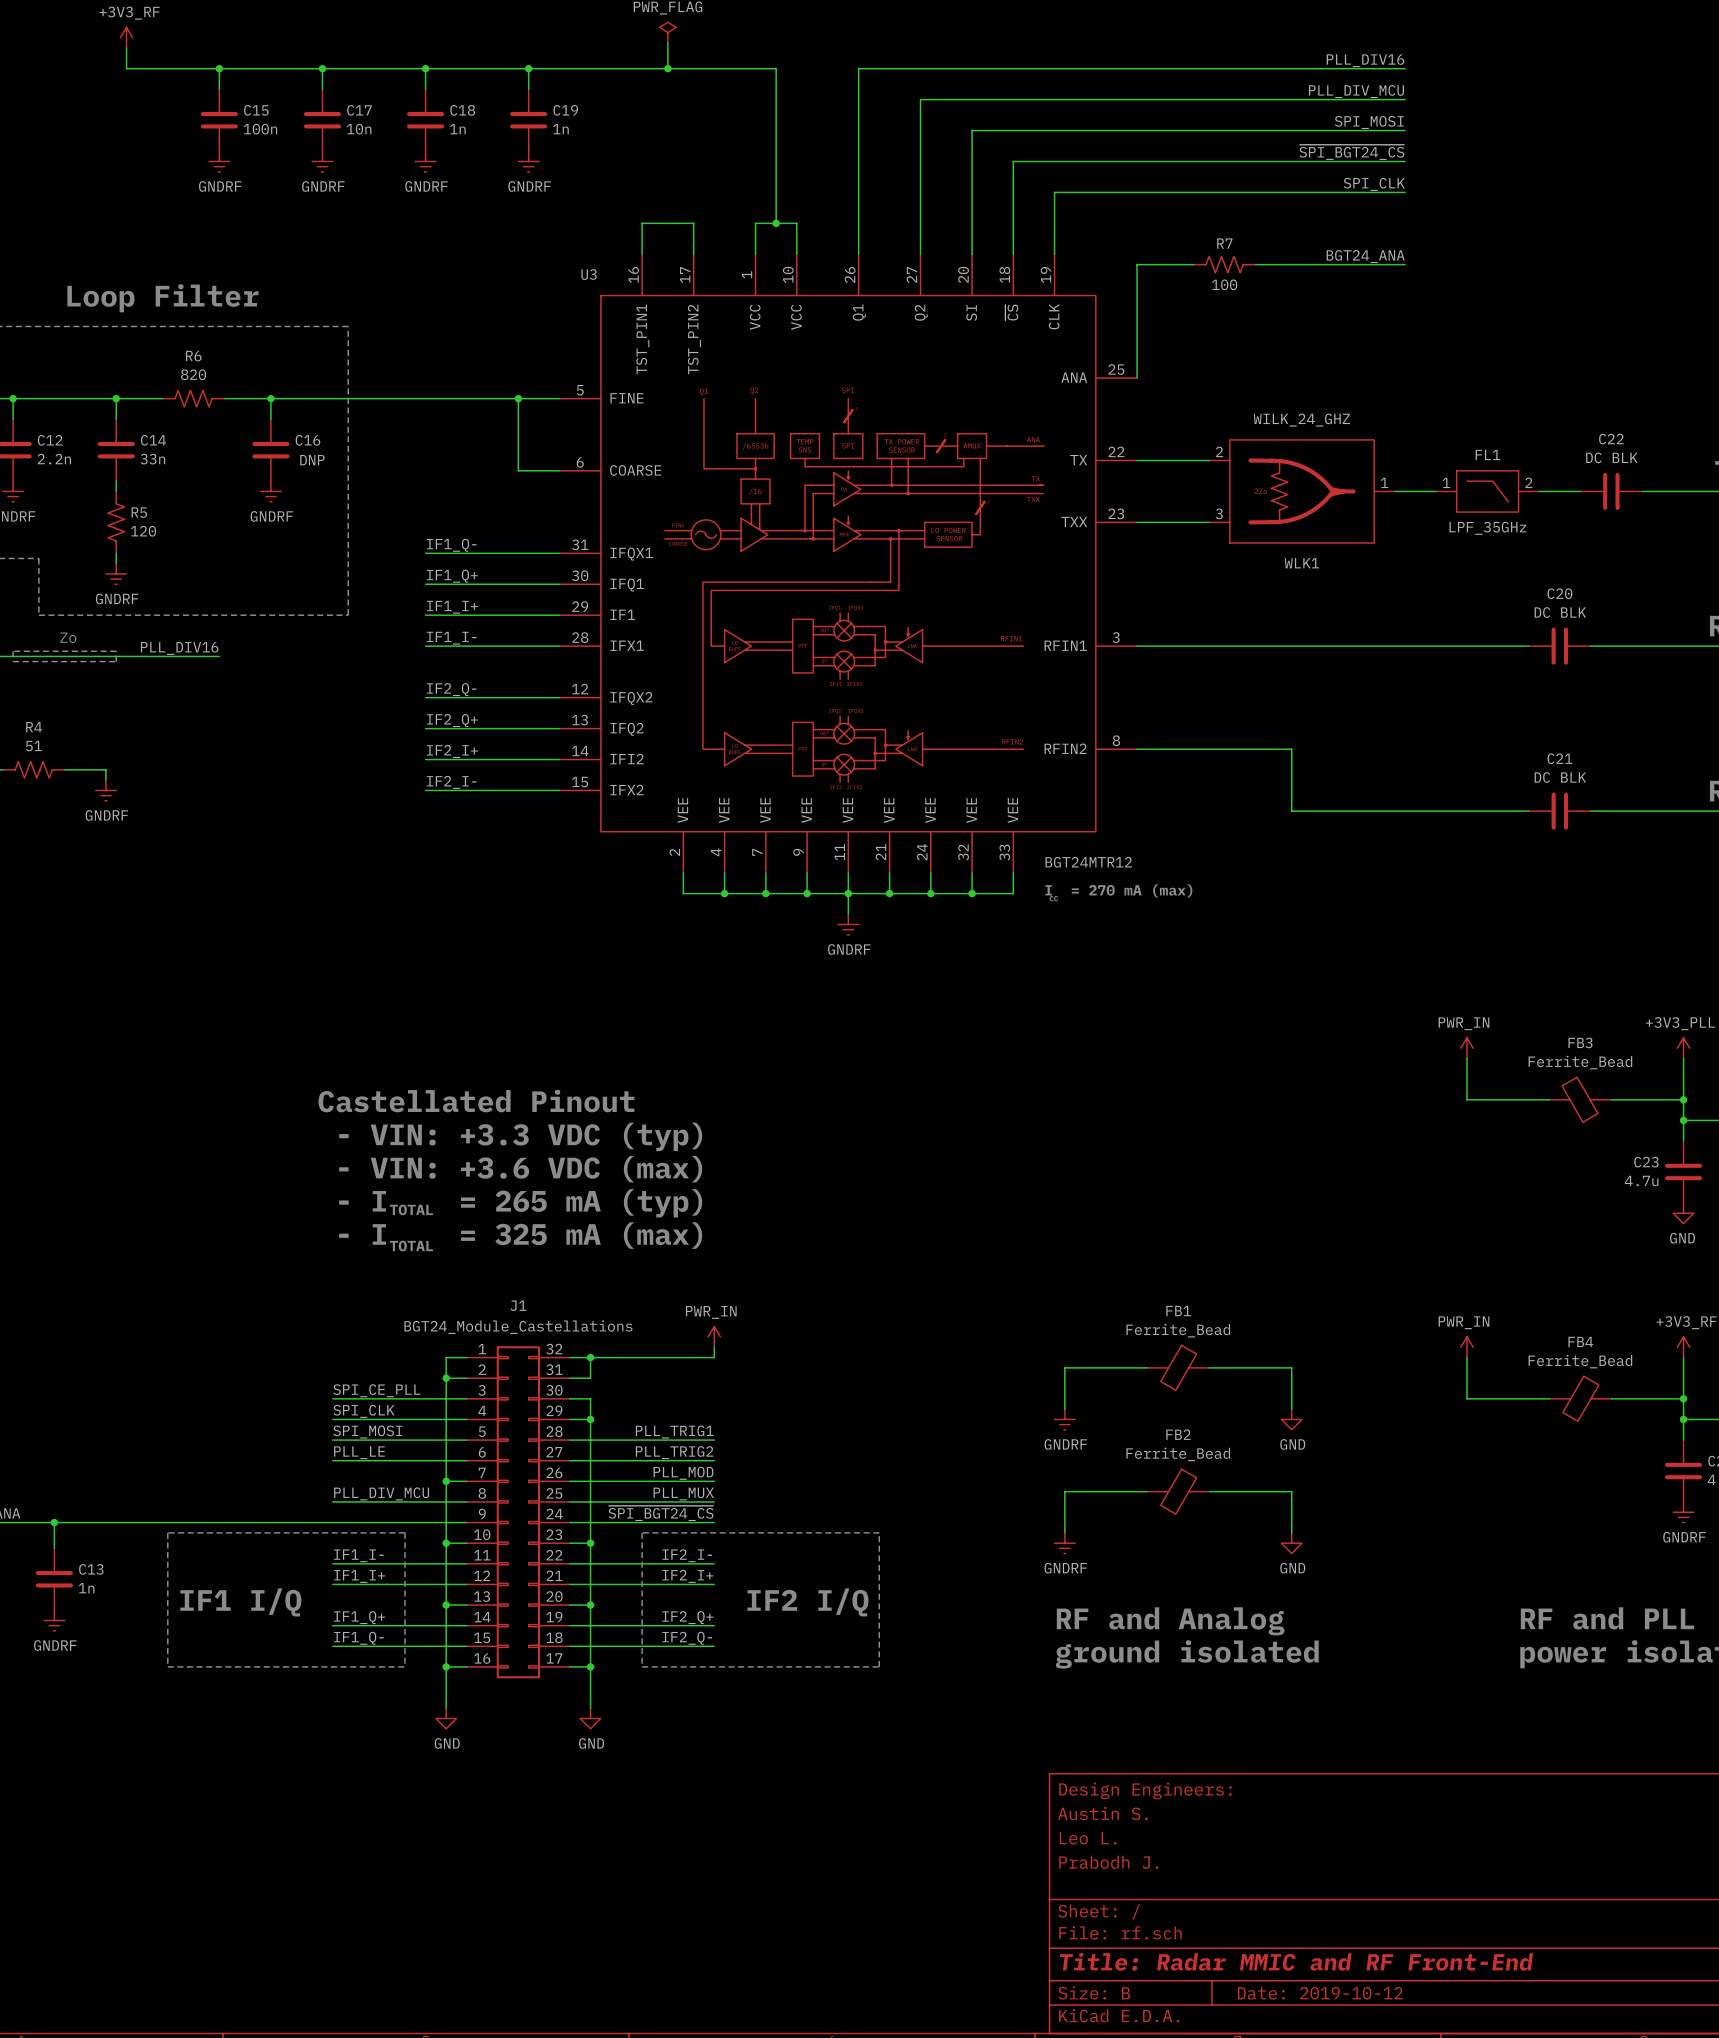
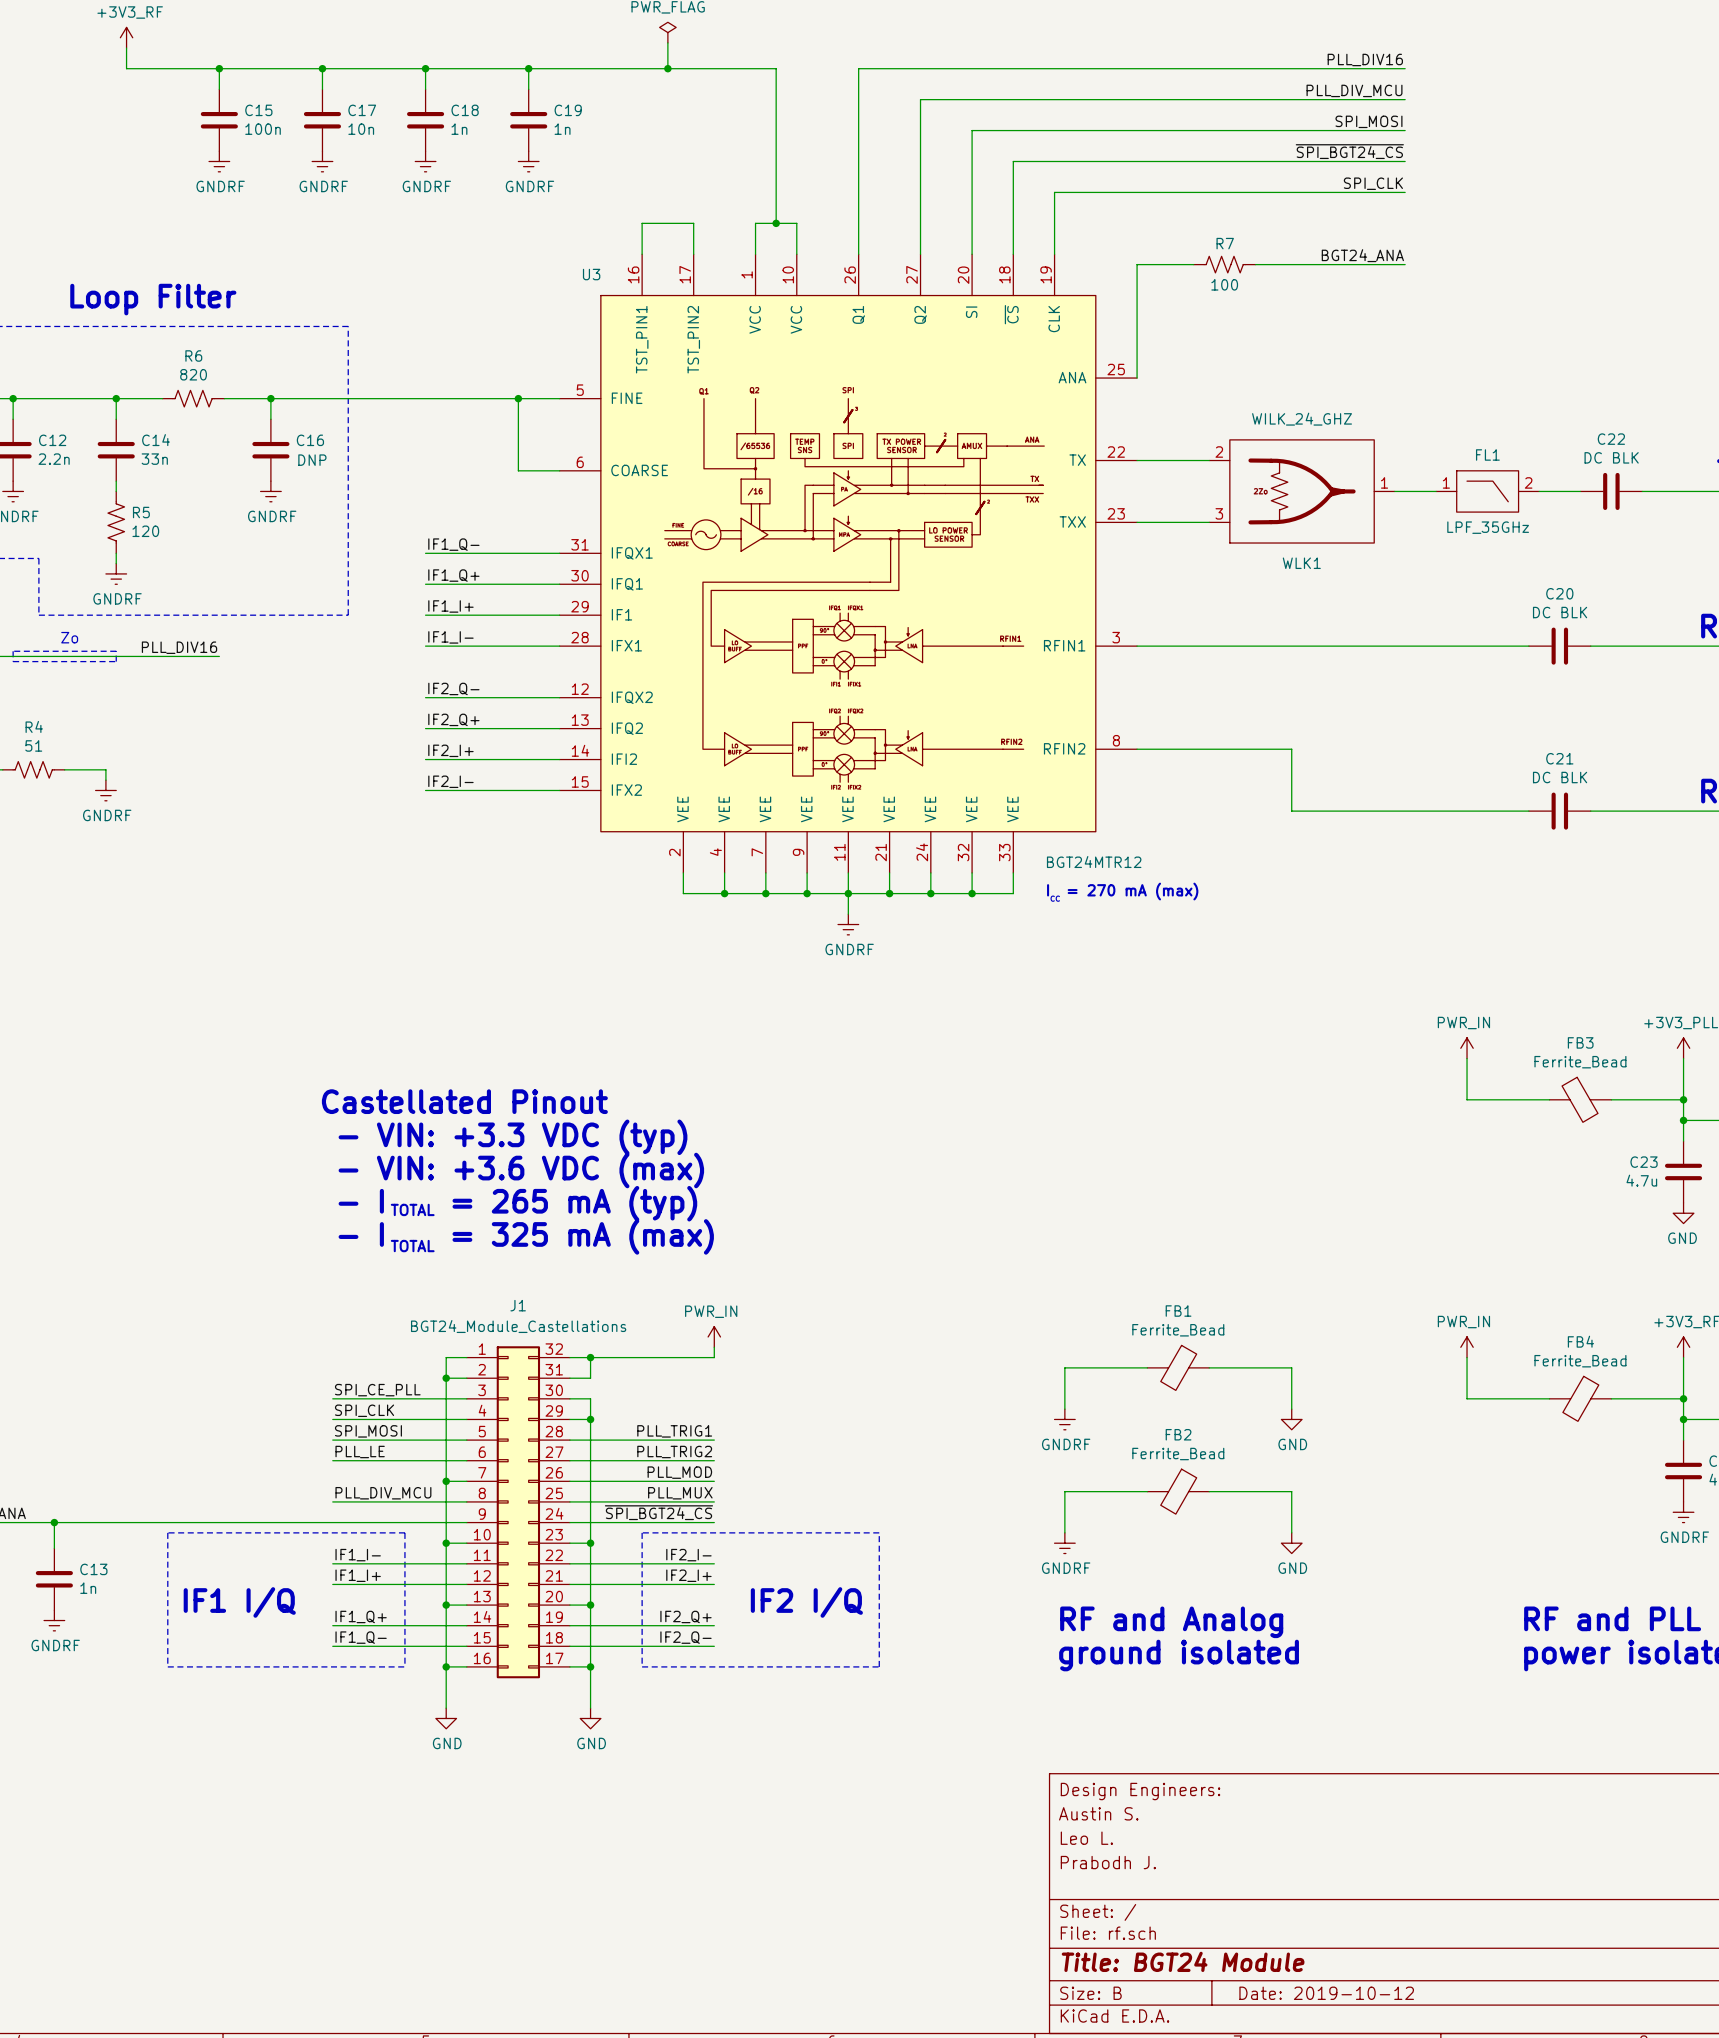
title block: Title: Radar MMIC and RF Front-End (1296, 1961) -> Title: BGT24 Module (1183, 1961)

